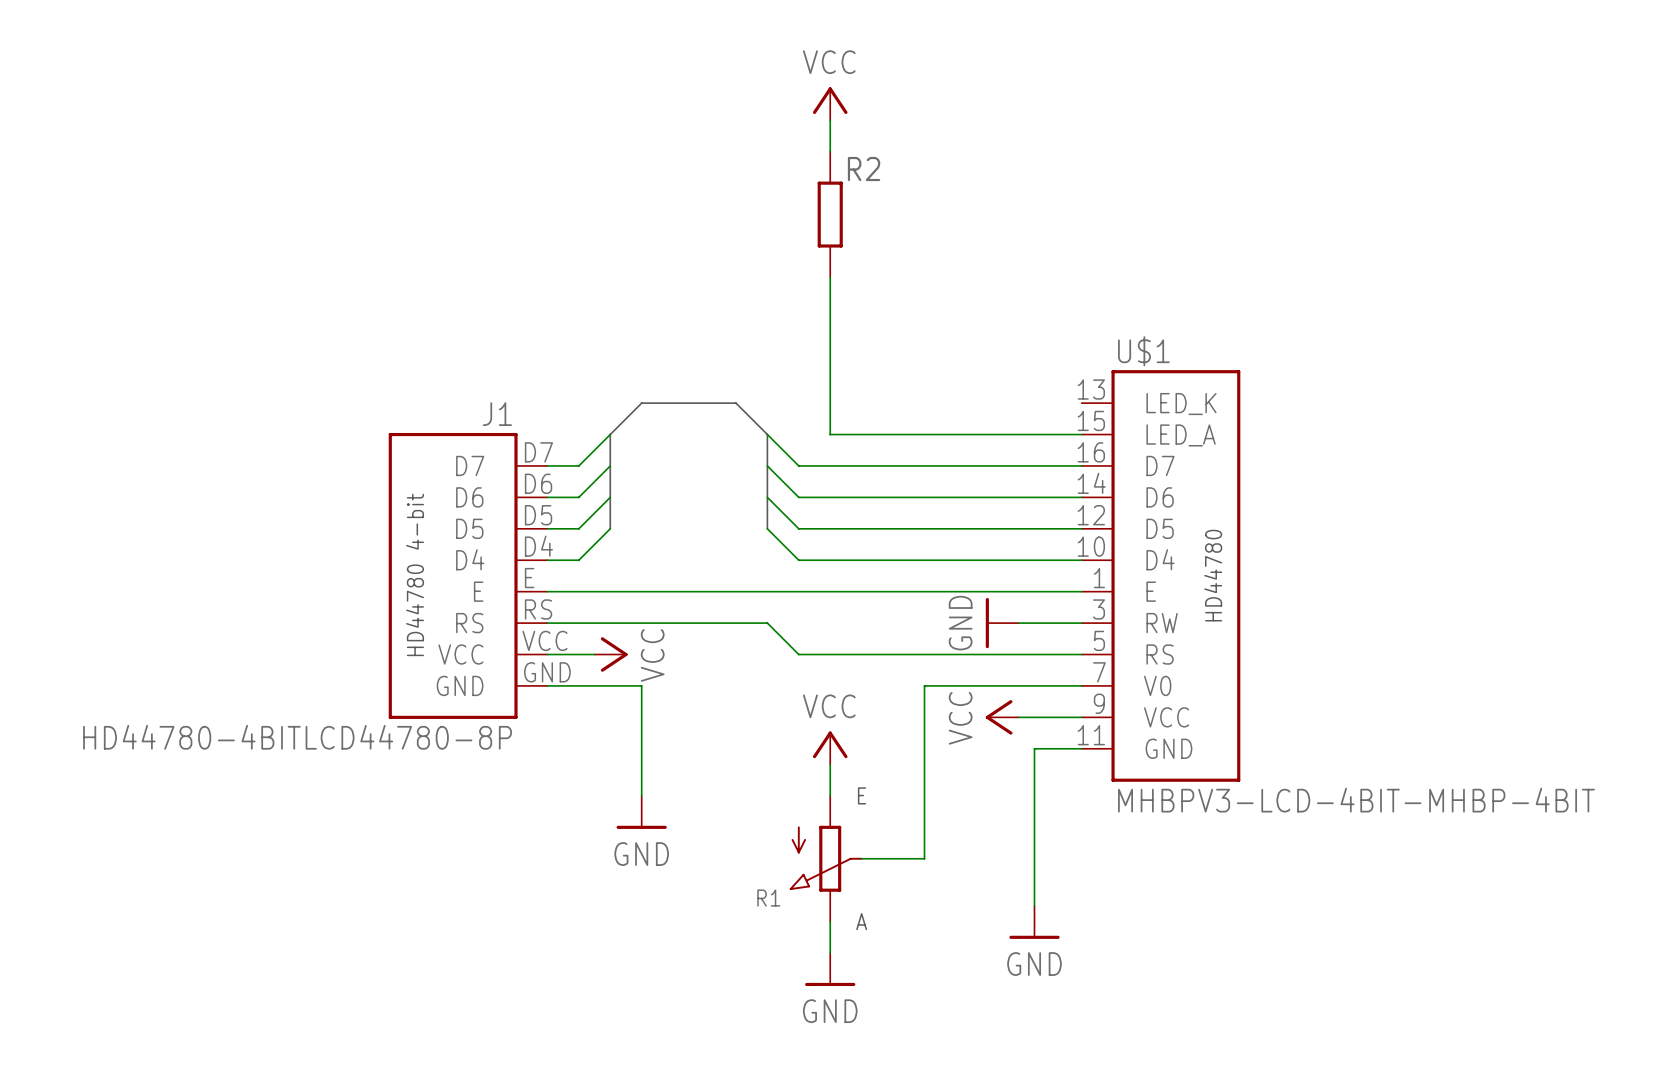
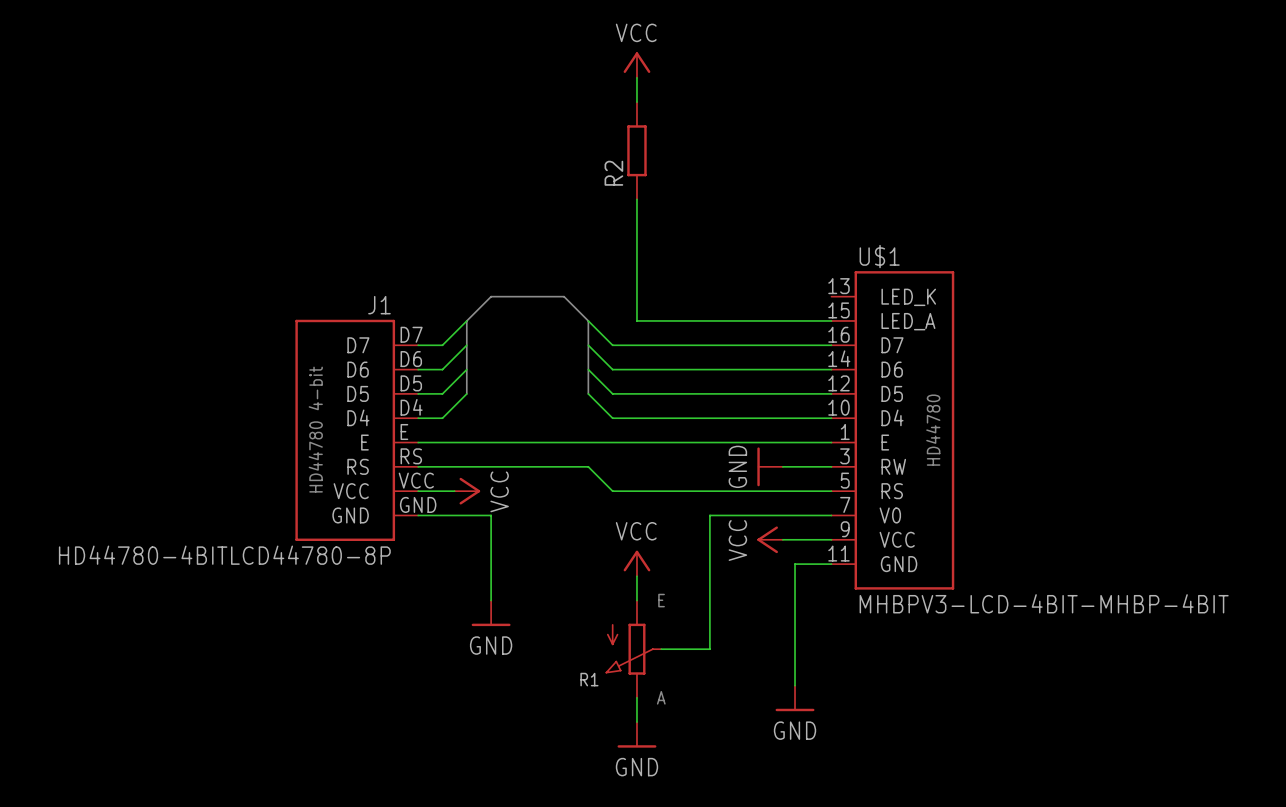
R2 name rotation: 0° (864, 169) -> 90° counterclockwise (613, 173)
R2 name position: R2 (864, 169) -> R2 (613, 173)

